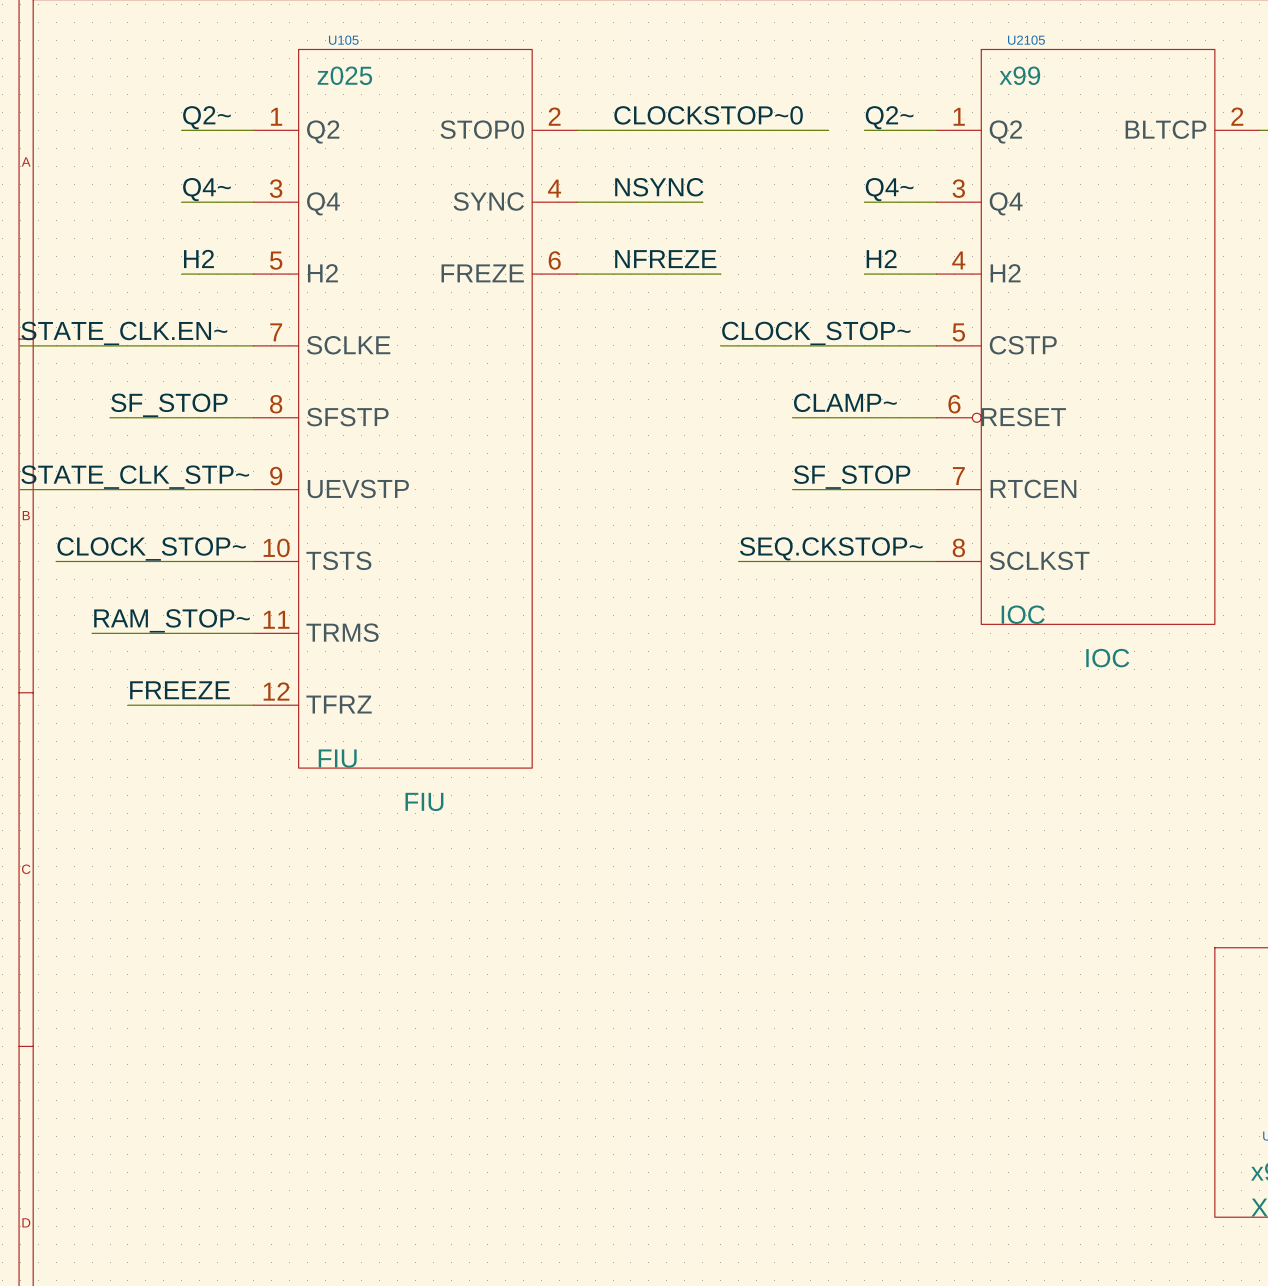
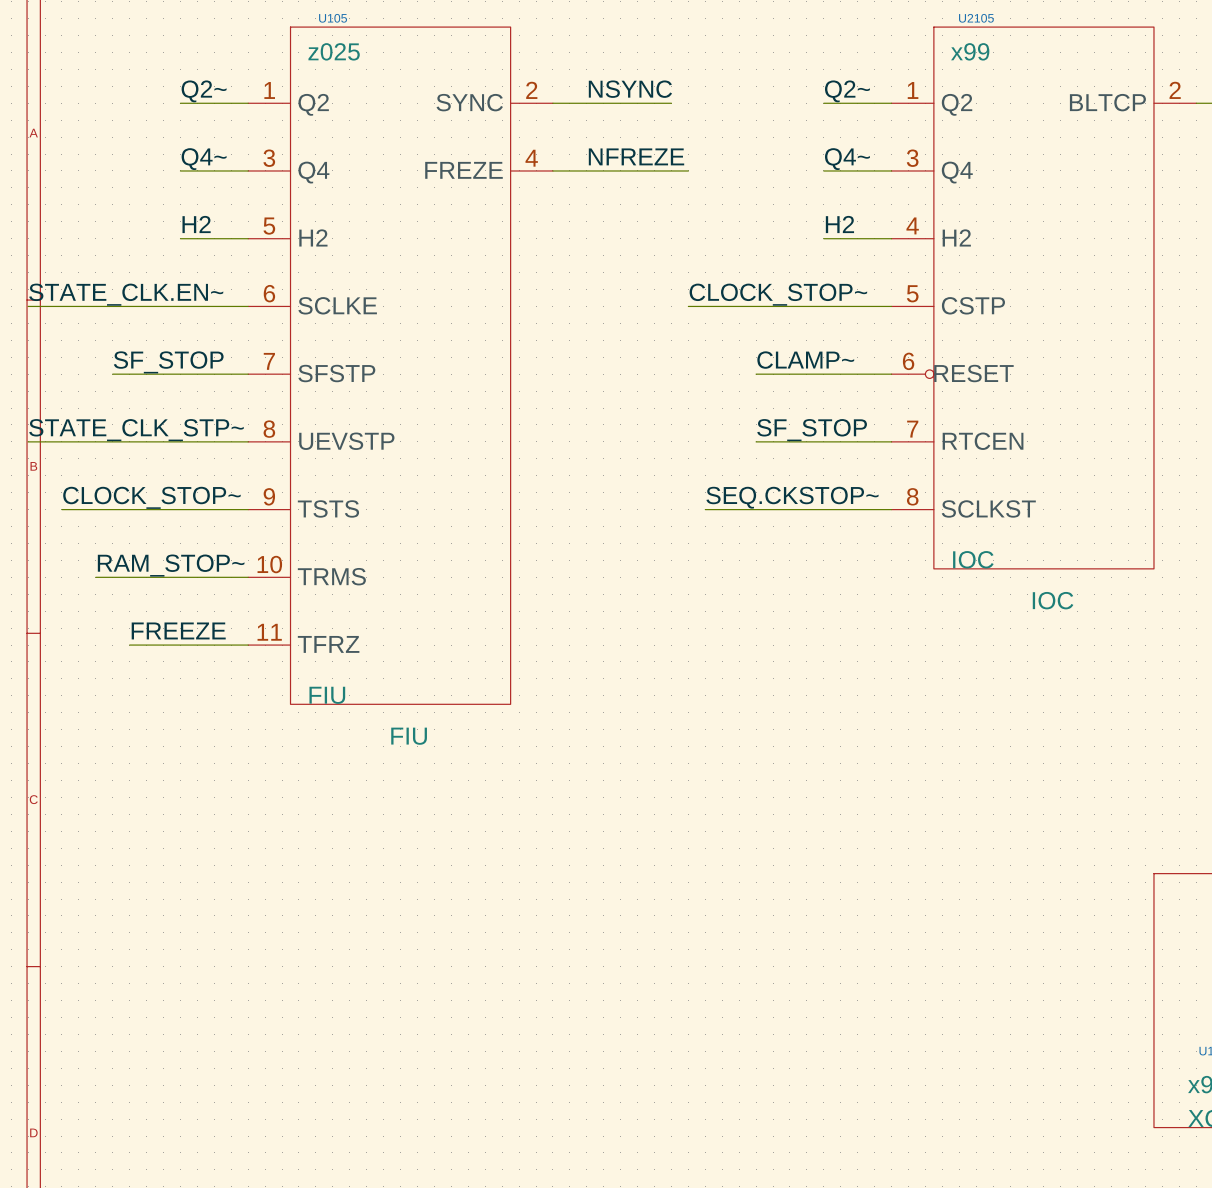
U105 symbol: [253, 49, 578, 769] -> [248, 27, 553, 705]
label: CLOCKSTOP~0 (708, 115) -> NSYNC (630, 89)
wire: (702, 130) (828, 130) -> none
label: NSYNC (659, 187) -> NFREZE (636, 156)
wire: none -> (671, 170) (688, 170)
label: NFREZE (665, 259) -> none
wire: (577, 274) (720, 274) -> none

